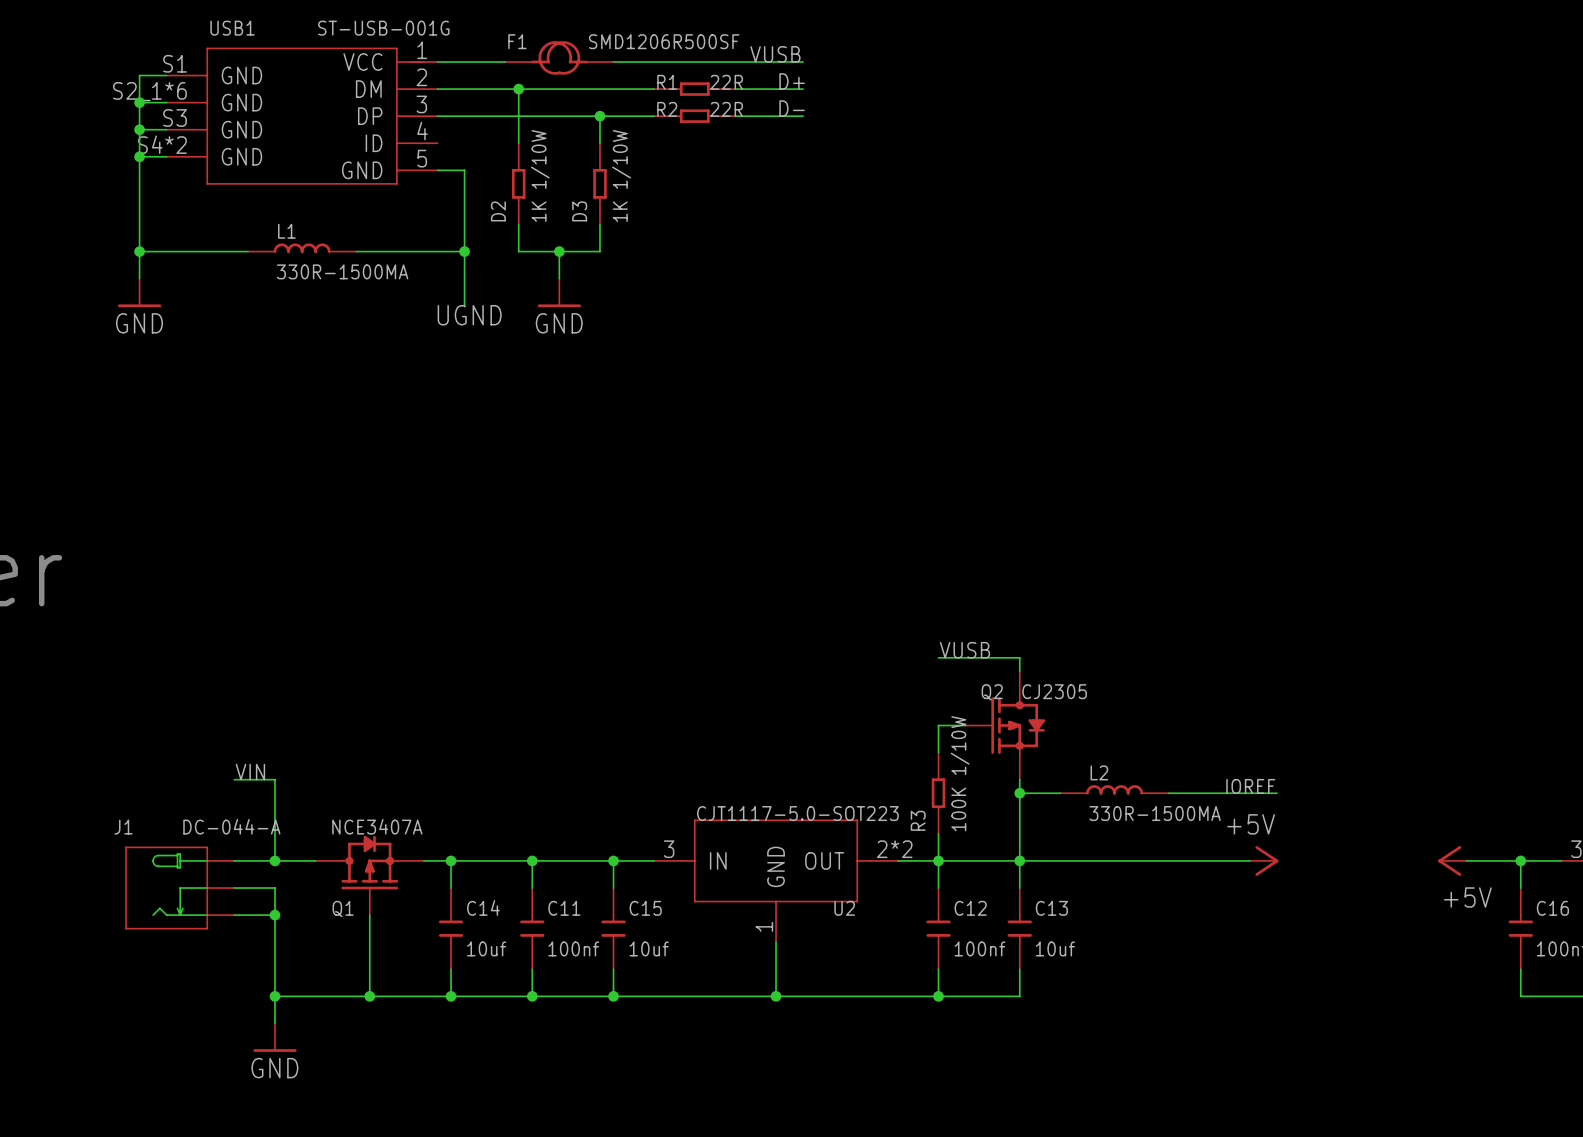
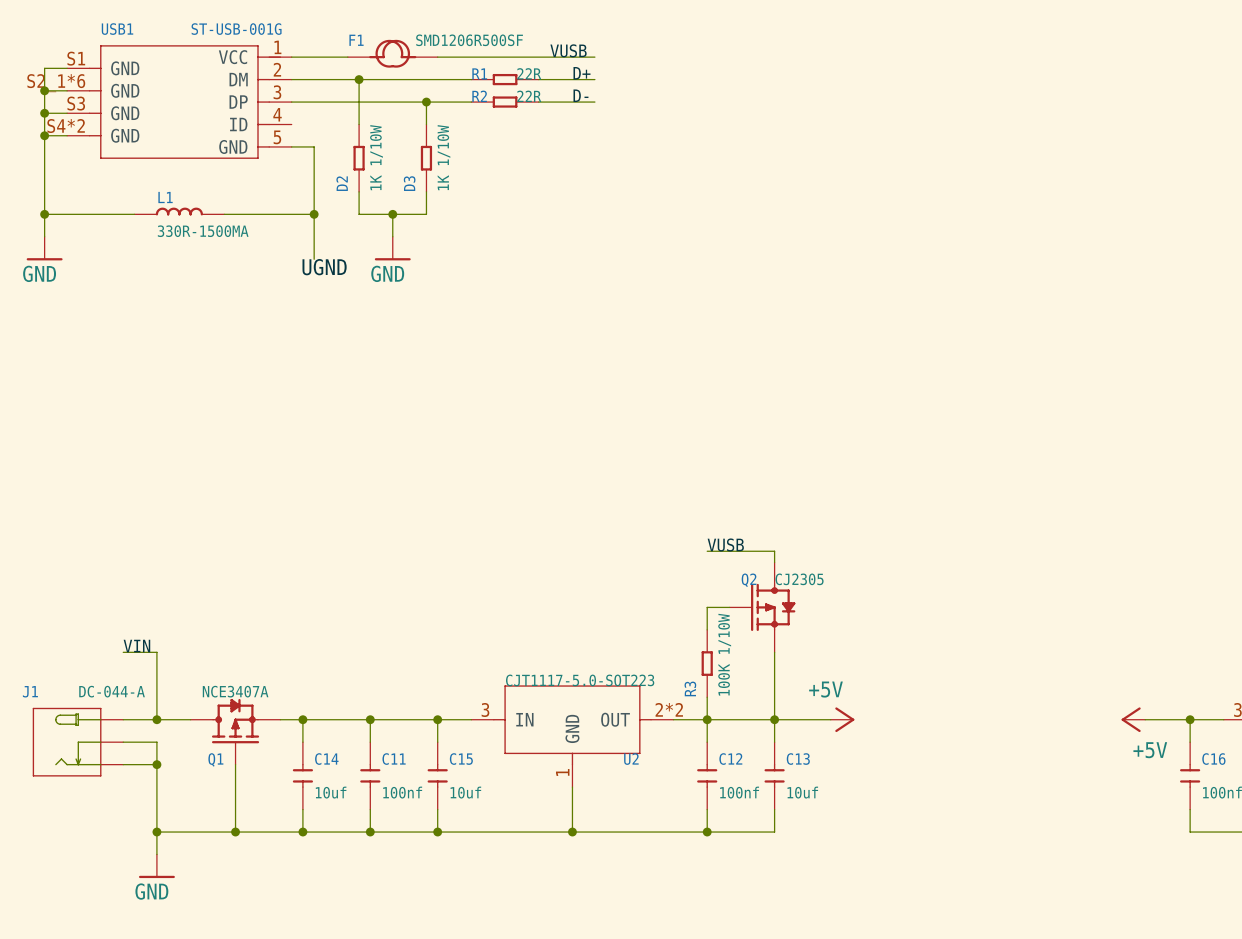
label: IOREF (1250, 786) -> none
L2: 330R-1500MA (1114, 789) -> none
wire: (1019, 793) (1060, 793) -> none
junction: (1019, 793) -> none
wire: (1168, 793) (1277, 793) -> none
wire: (1087, 860) (1249, 860) -> none
power symbol position: +5V (1264, 860) -> +5V (842, 719)

